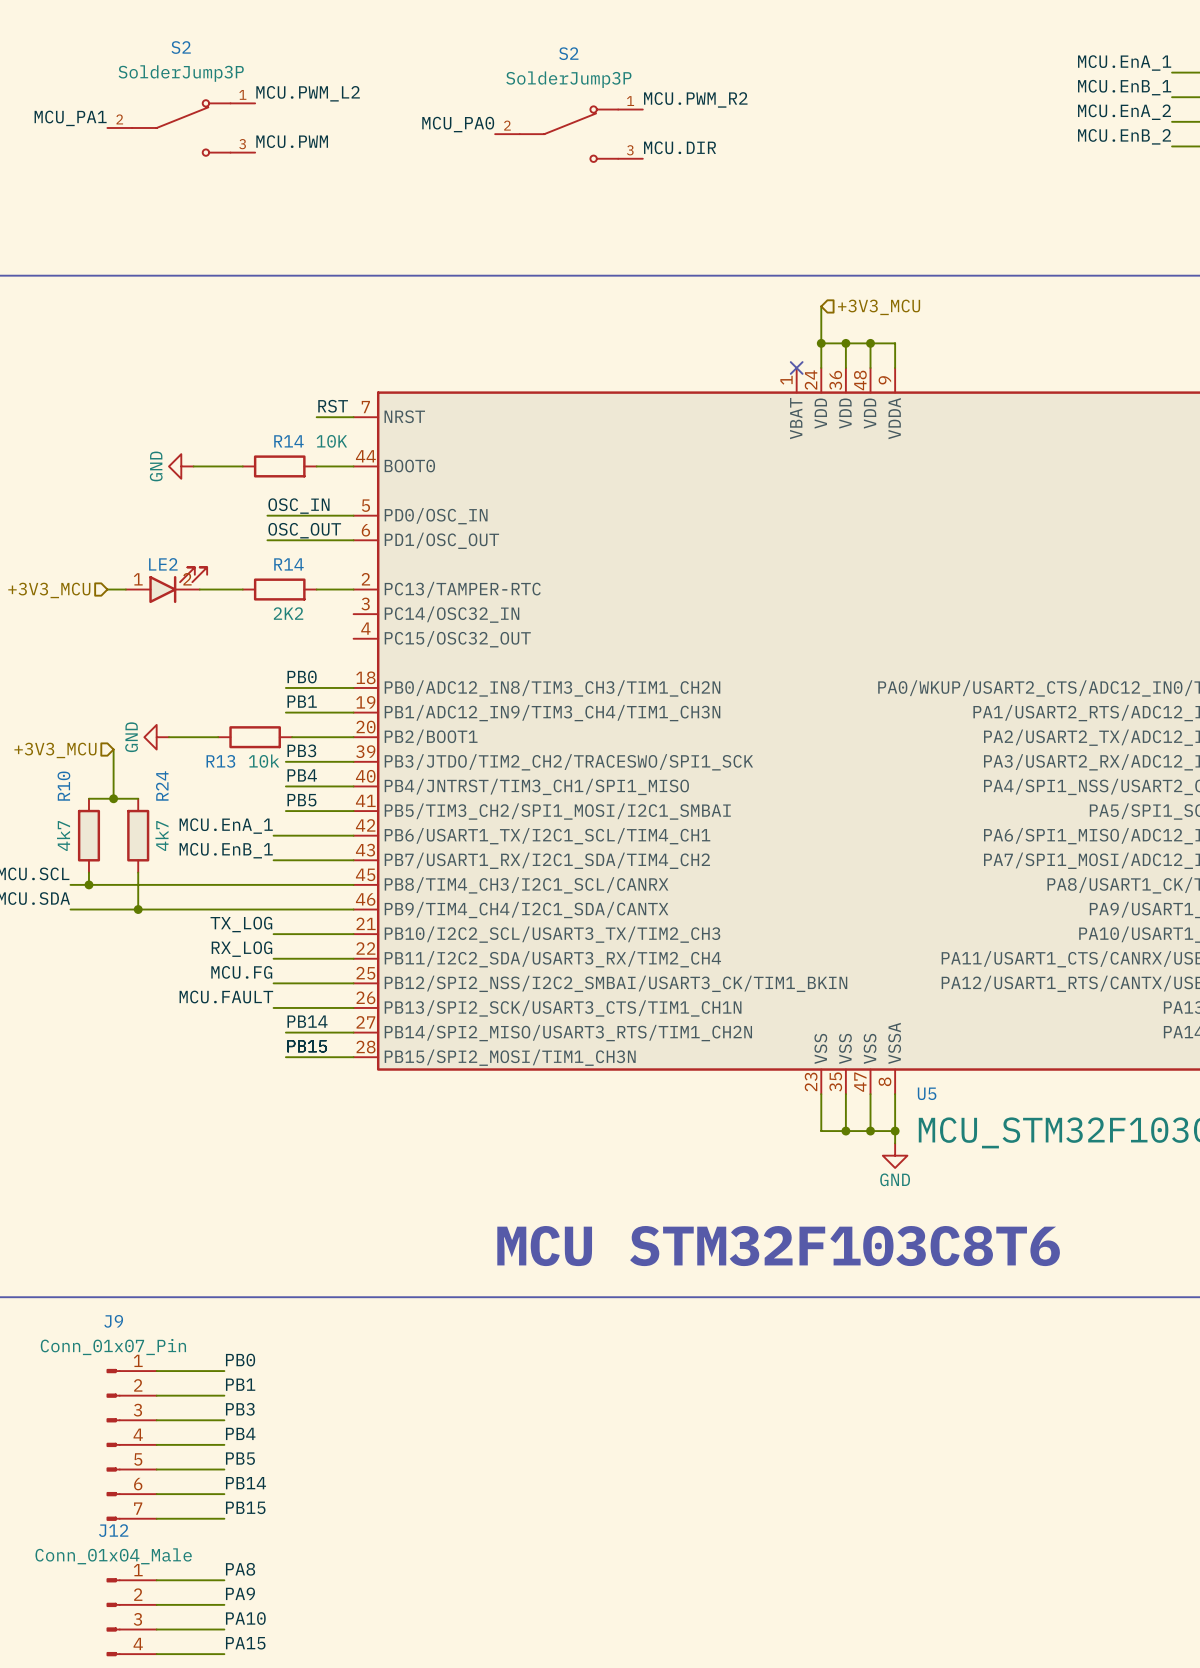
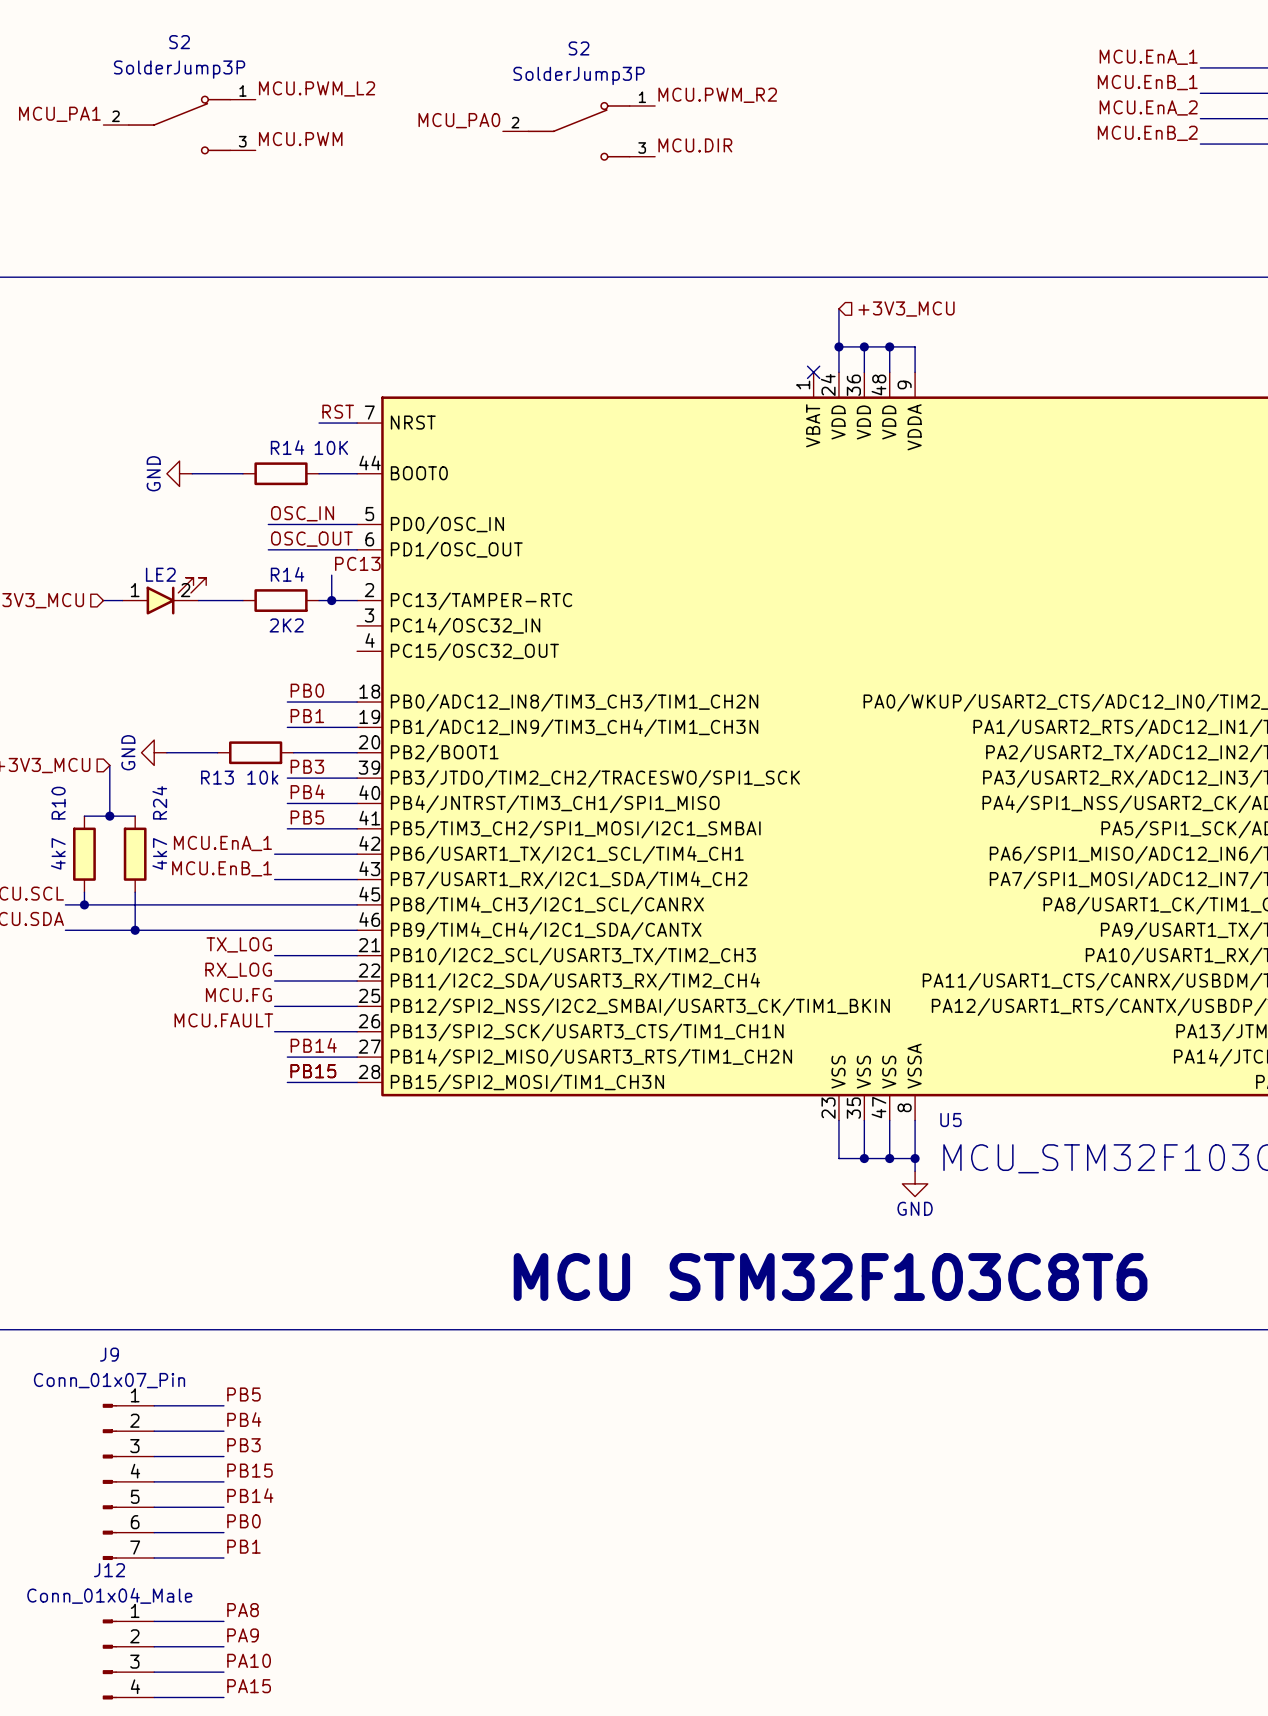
label: none -> PC13 (357, 563)
wire: none -> (331, 575) (331, 600)
junction: none -> (331, 600)
label: PB0 (240, 1360) -> PB5 (243, 1394)
label: PB1 (240, 1384) -> PB4 (244, 1419)
label: PB4 (240, 1433) -> PB15 (250, 1470)
label: PB5 (240, 1458) -> PB14 (250, 1495)
label: PB14 (245, 1483) -> PB0 (243, 1521)
label: PB15 (245, 1507) -> PB1 (243, 1546)

